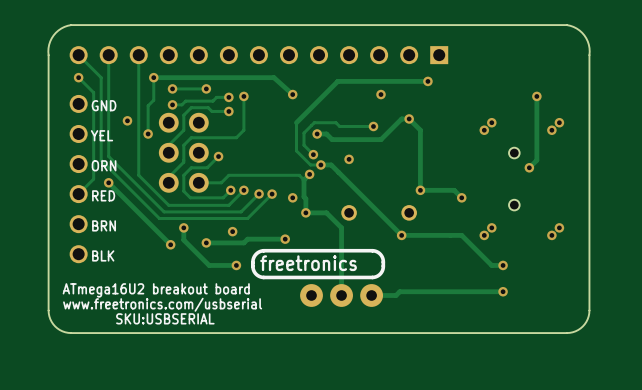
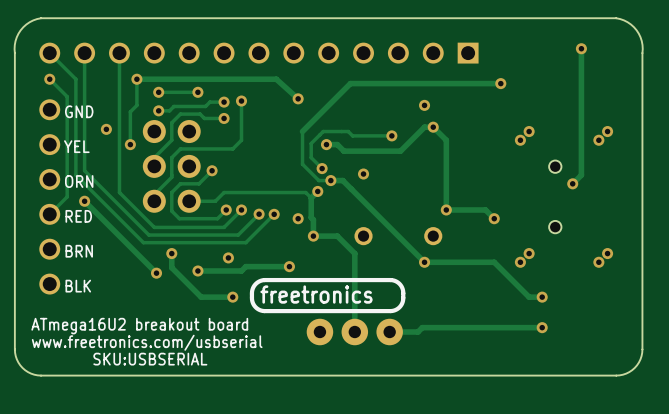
track: none -> (581, 48) (581, 101)
via: none -> (581, 48)
via: (427, 81) -> none
track: none -> (500, 83) (455, 83)
via: none -> (500, 83)
via: (380, 94) -> none
via: (536, 96) -> none
via: none -> (424, 105)

